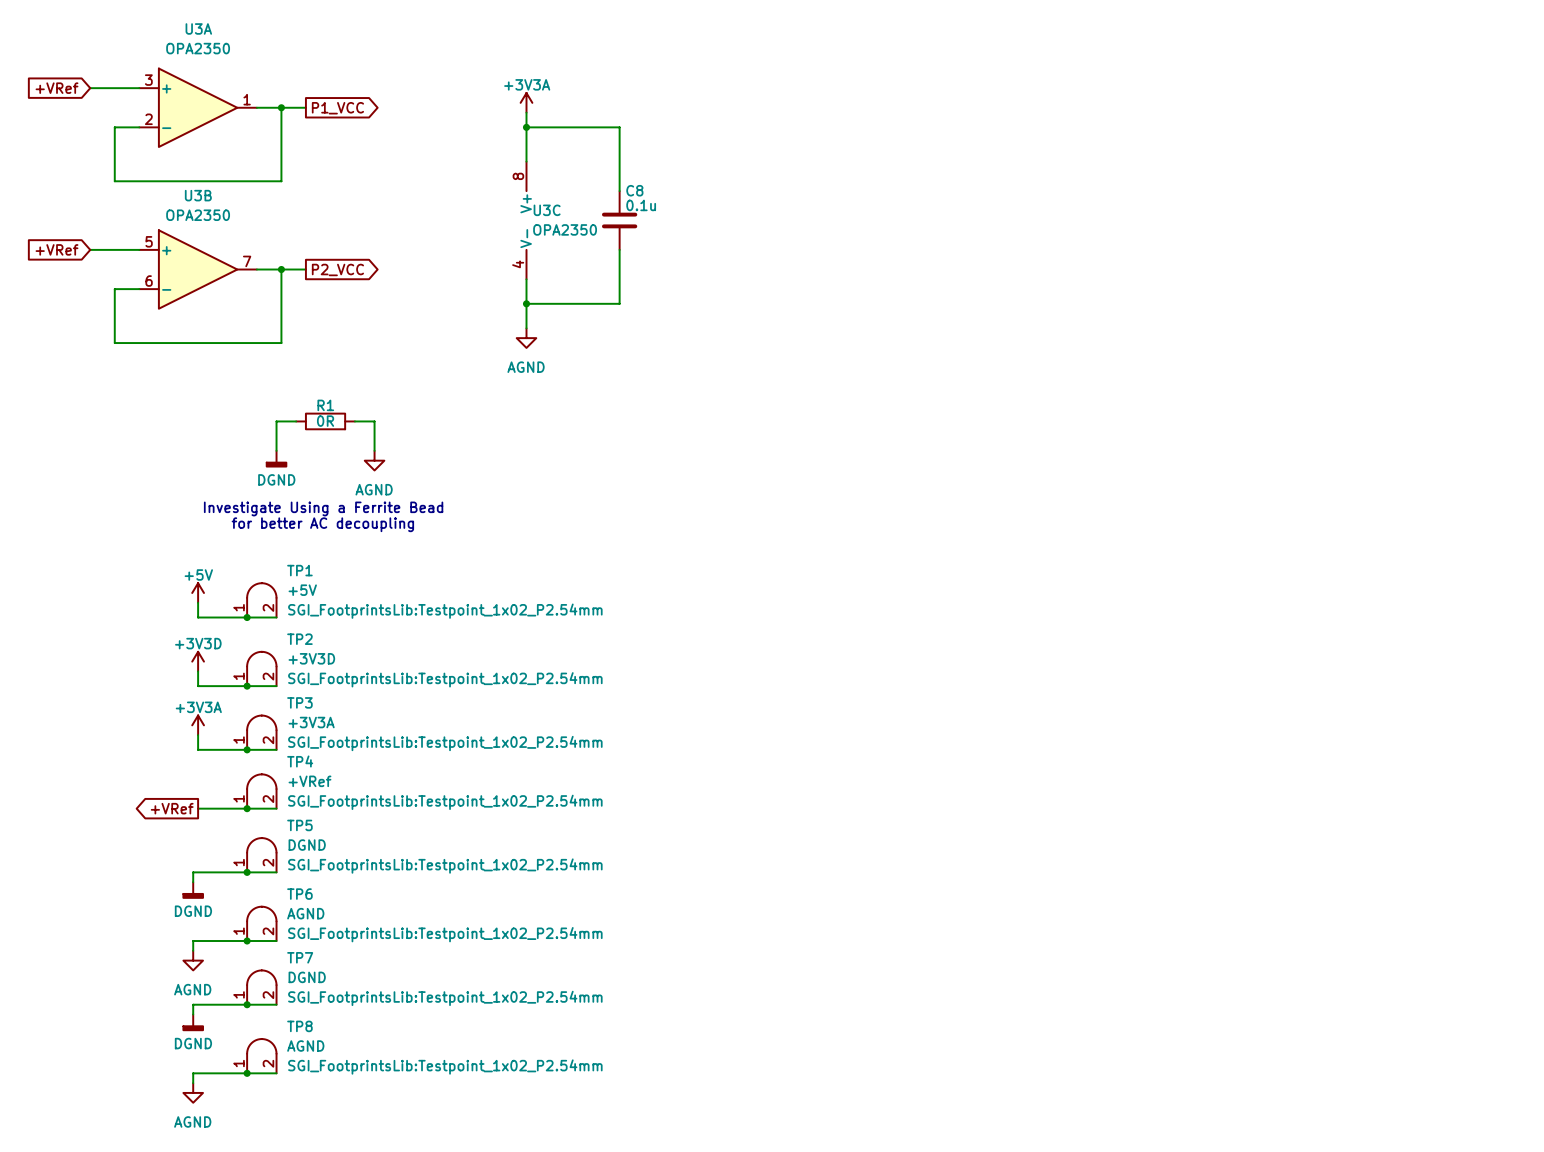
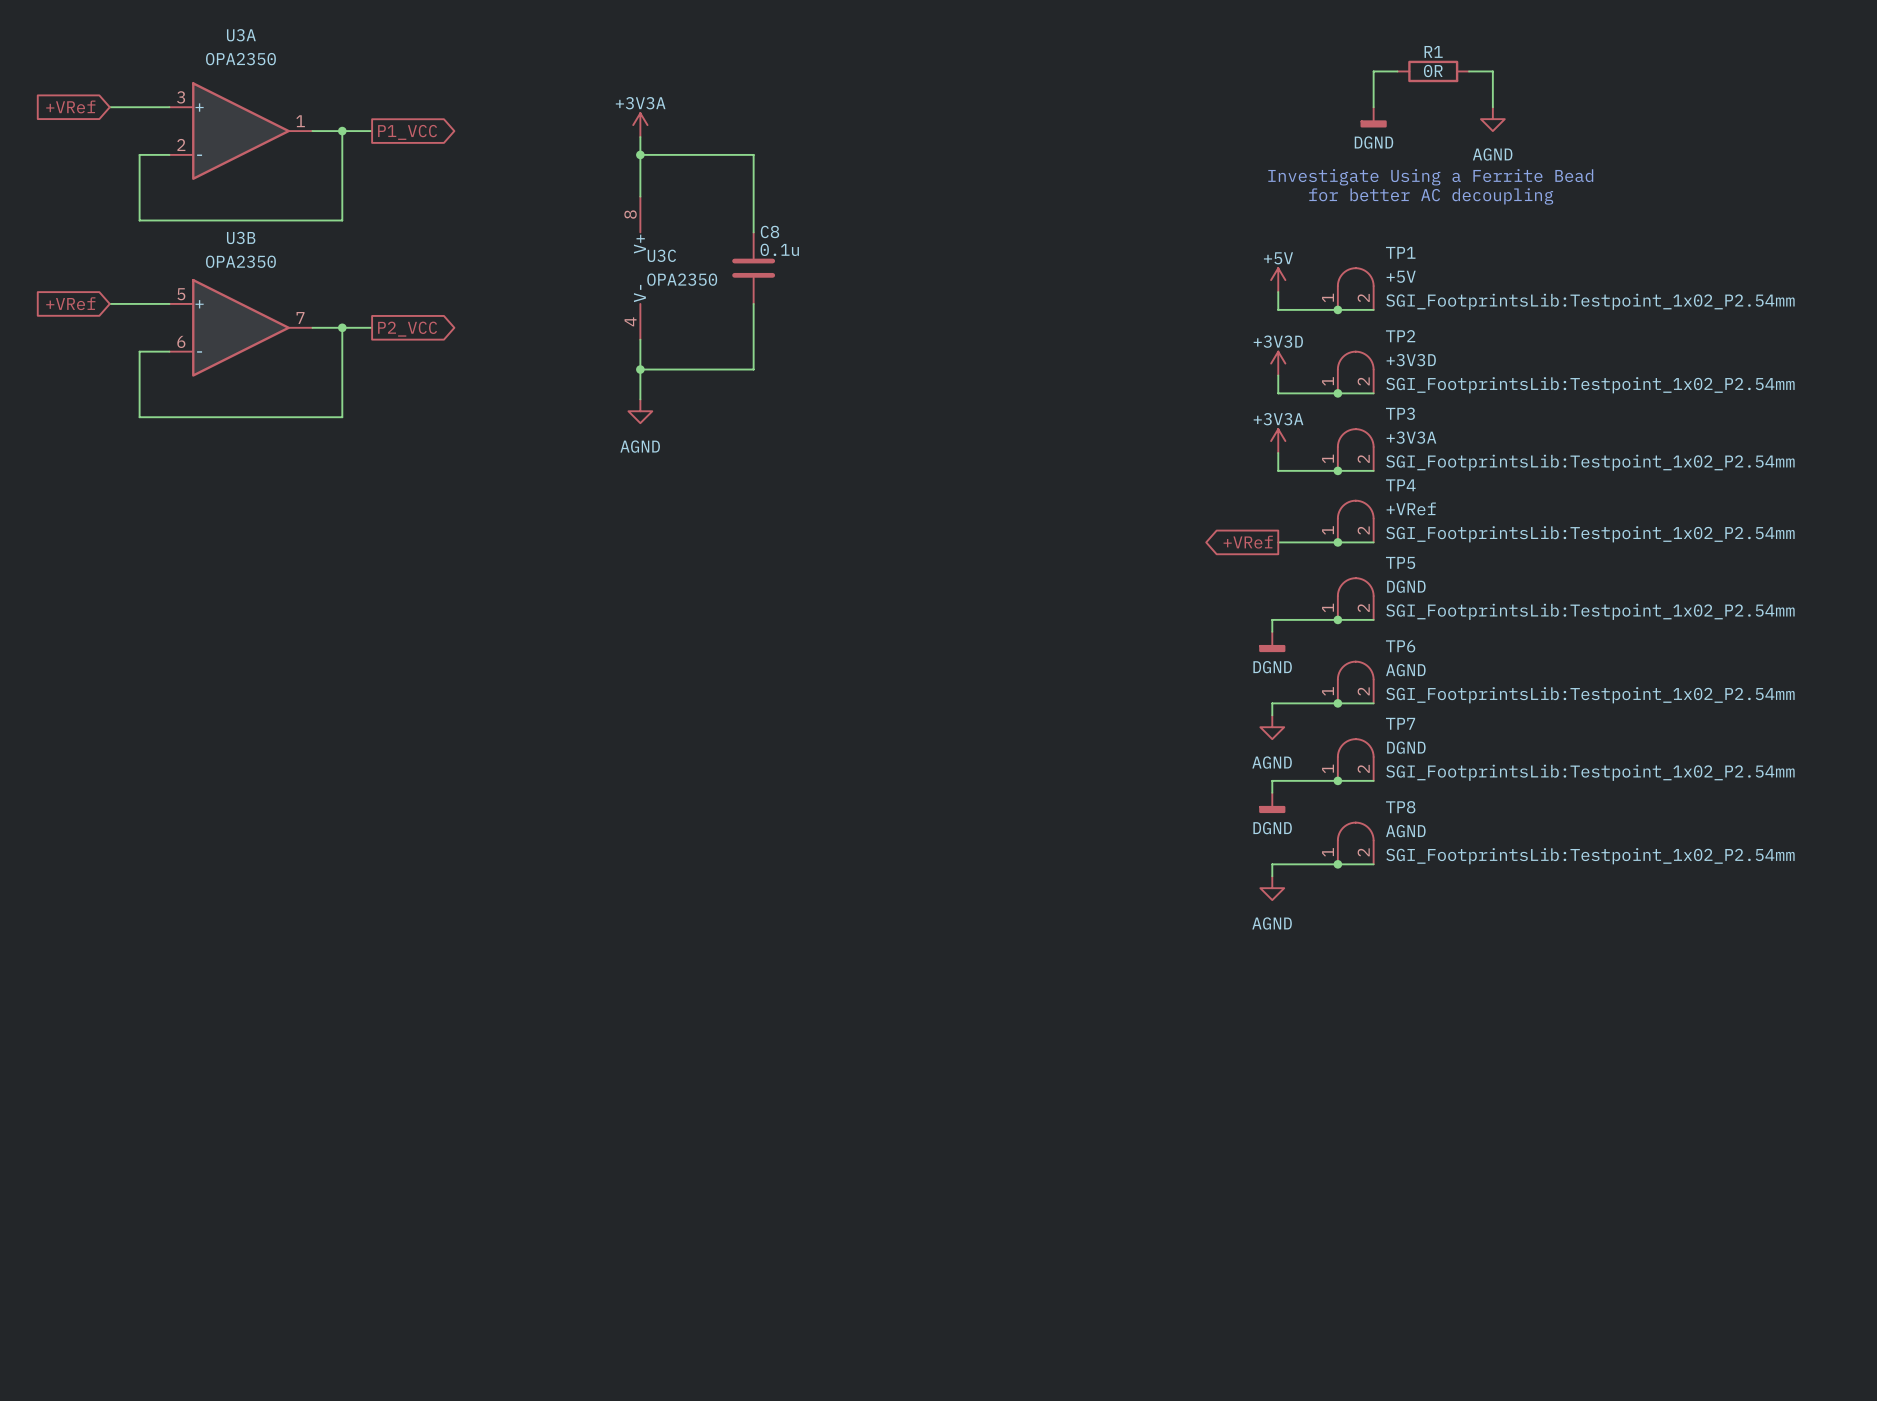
wire: none -> (1397, 71) (1373, 71) (1373, 107)
wire: none -> (1469, 71) (1492, 71) (1492, 107)
power symbol: none -> DGND (1373, 117)
power symbol: none -> AGND (1492, 119)
text: none -> Investigate Using a Ferrite Bead (1430, 177)
text: none -> for better AC decoupling (1431, 196)
power symbol: none -> +5V (1278, 280)
wire: none -> (1278, 292) (1278, 309) (1373, 309)
junction: none -> (1337, 309)
power symbol: none -> +3V3D (1278, 363)
wire: none -> (1278, 375) (1278, 393) (1373, 393)
junction: none -> (1337, 393)
power symbol: none -> +3V3A (1278, 441)
wire: none -> (1278, 452) (1278, 470) (1373, 470)
junction: none -> (1337, 470)
wire: (296, 421) (276, 421) (276, 450) -> none
R1 position: (325, 421) -> (1433, 71)
wire: (354, 421) (374, 421) (374, 450) -> none
global label: none -> +VRef (1248, 542)
wire: none -> (1278, 542) (1373, 542)
junction: none -> (1337, 542)
power symbol: DGND (276, 459) -> none
power symbol: AGND (374, 460) -> none
text: Investigate Using a Ferrite Bead (323, 508) -> none
junction: none -> (1337, 619)
wire: none -> (1373, 619) (1272, 619) (1272, 631)
text: for better AC decoupling (322, 524) -> none
power symbol: none -> DGND (1272, 641)
junction: none -> (1337, 703)
wire: none -> (1373, 703) (1272, 703) (1272, 715)
power symbol: +5V (198, 593) -> none
power symbol: none -> AGND (1272, 727)
TP1 position: (261, 600) -> (1355, 289)
wire: (198, 602) (198, 617) (276, 617) -> none
junction: (247, 617) -> none
junction: none -> (1337, 780)
wire: none -> (1373, 780) (1272, 780) (1272, 792)
power symbol: none -> DGND (1272, 802)
power symbol: +3V3D (198, 661) -> none
TP2 position: (261, 668) -> (1355, 372)
wire: (198, 671) (198, 686) (276, 686) -> none
junction: (247, 686) -> none
junction: none -> (1337, 864)
wire: none -> (1373, 864) (1272, 864) (1272, 876)
power symbol: +3V3A (198, 725) -> none
power symbol: none -> AGND (1272, 888)
TP3 position: (261, 732) -> (1355, 450)
wire: (198, 735) (198, 749) (276, 749) -> none
junction: (247, 749) -> none
TP4 position: (261, 791) -> (1355, 521)
global label: +VRef (172, 808) -> none
wire: (198, 808) (276, 808) -> none
junction: (247, 808) -> none
TP5 position: (261, 855) -> (1355, 599)
junction: (247, 872) -> none
wire: (276, 872) (193, 872) (193, 882) -> none
power symbol: DGND (193, 890) -> none
TP6 position: (261, 923) -> (1355, 682)
junction: (247, 941) -> none
wire: (276, 941) (193, 941) (193, 950) -> none
power symbol: AGND (193, 960) -> none
TP7 position: (261, 987) -> (1355, 760)
junction: (247, 1004) -> none
wire: (276, 1004) (193, 1004) (193, 1014) -> none
power symbol: DGND (193, 1022) -> none
TP8 position: (261, 1056) -> (1355, 843)
junction: (247, 1073) -> none
wire: (276, 1073) (193, 1073) (193, 1083) -> none
power symbol: AGND (193, 1092) -> none

